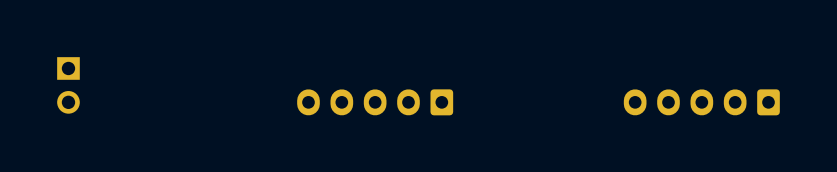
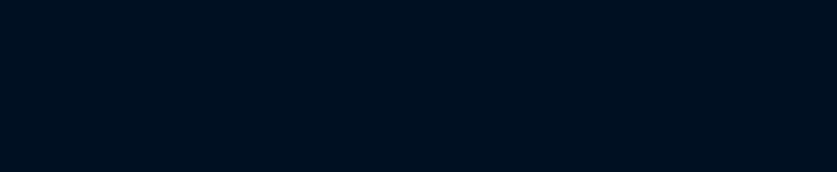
part: (68, 85) -> none
part: (375, 102) -> none
part: (701, 102) -> none

